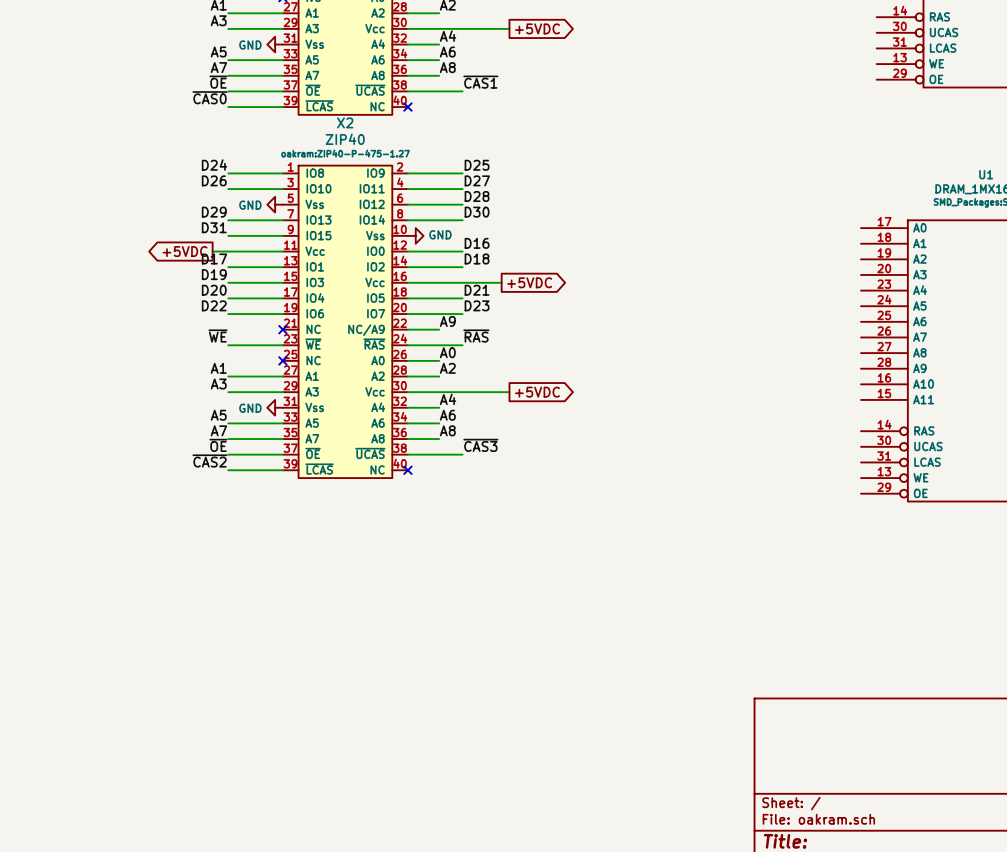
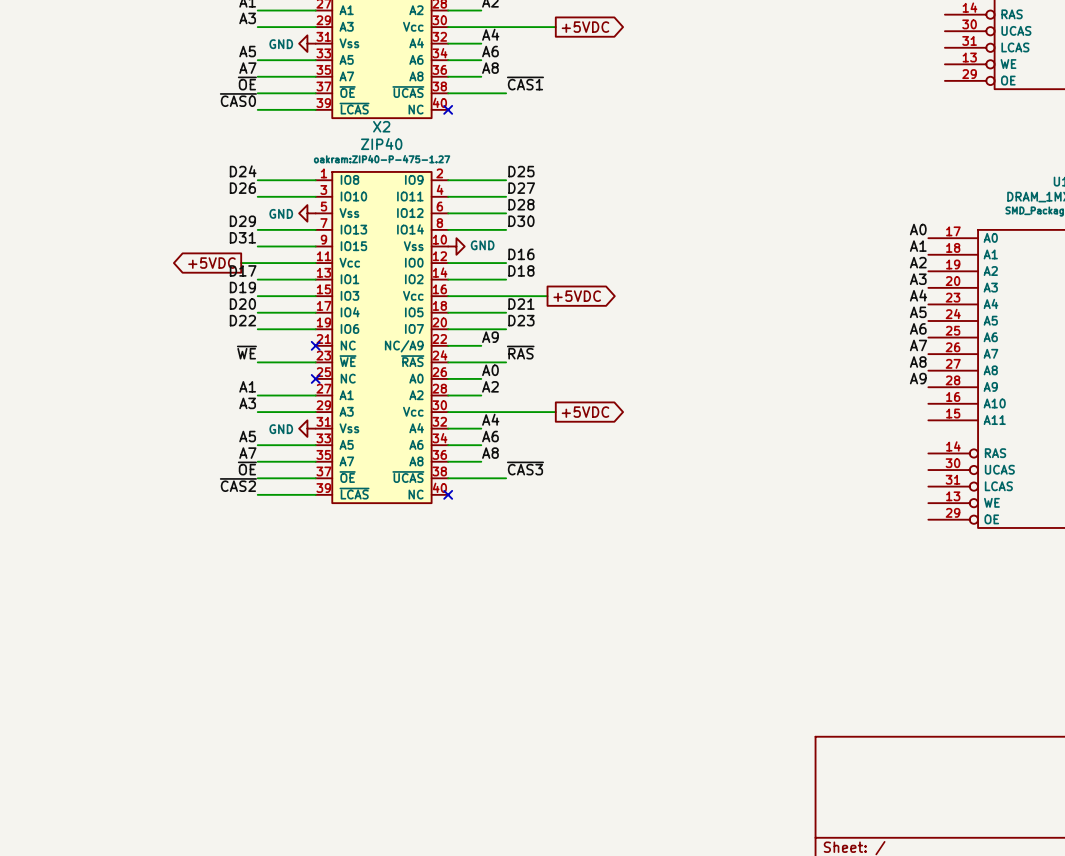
label: none -> A0 (918, 229)
label: none -> A1 (918, 246)
label: none -> A2 (918, 262)
label: none -> A3 (918, 279)
label: none -> A4 (918, 295)
label: none -> A5 (918, 312)
label: none -> A6 (918, 328)
label: none -> A7 (918, 345)
label: none -> A8 (918, 362)
label: none -> A9 (918, 378)

